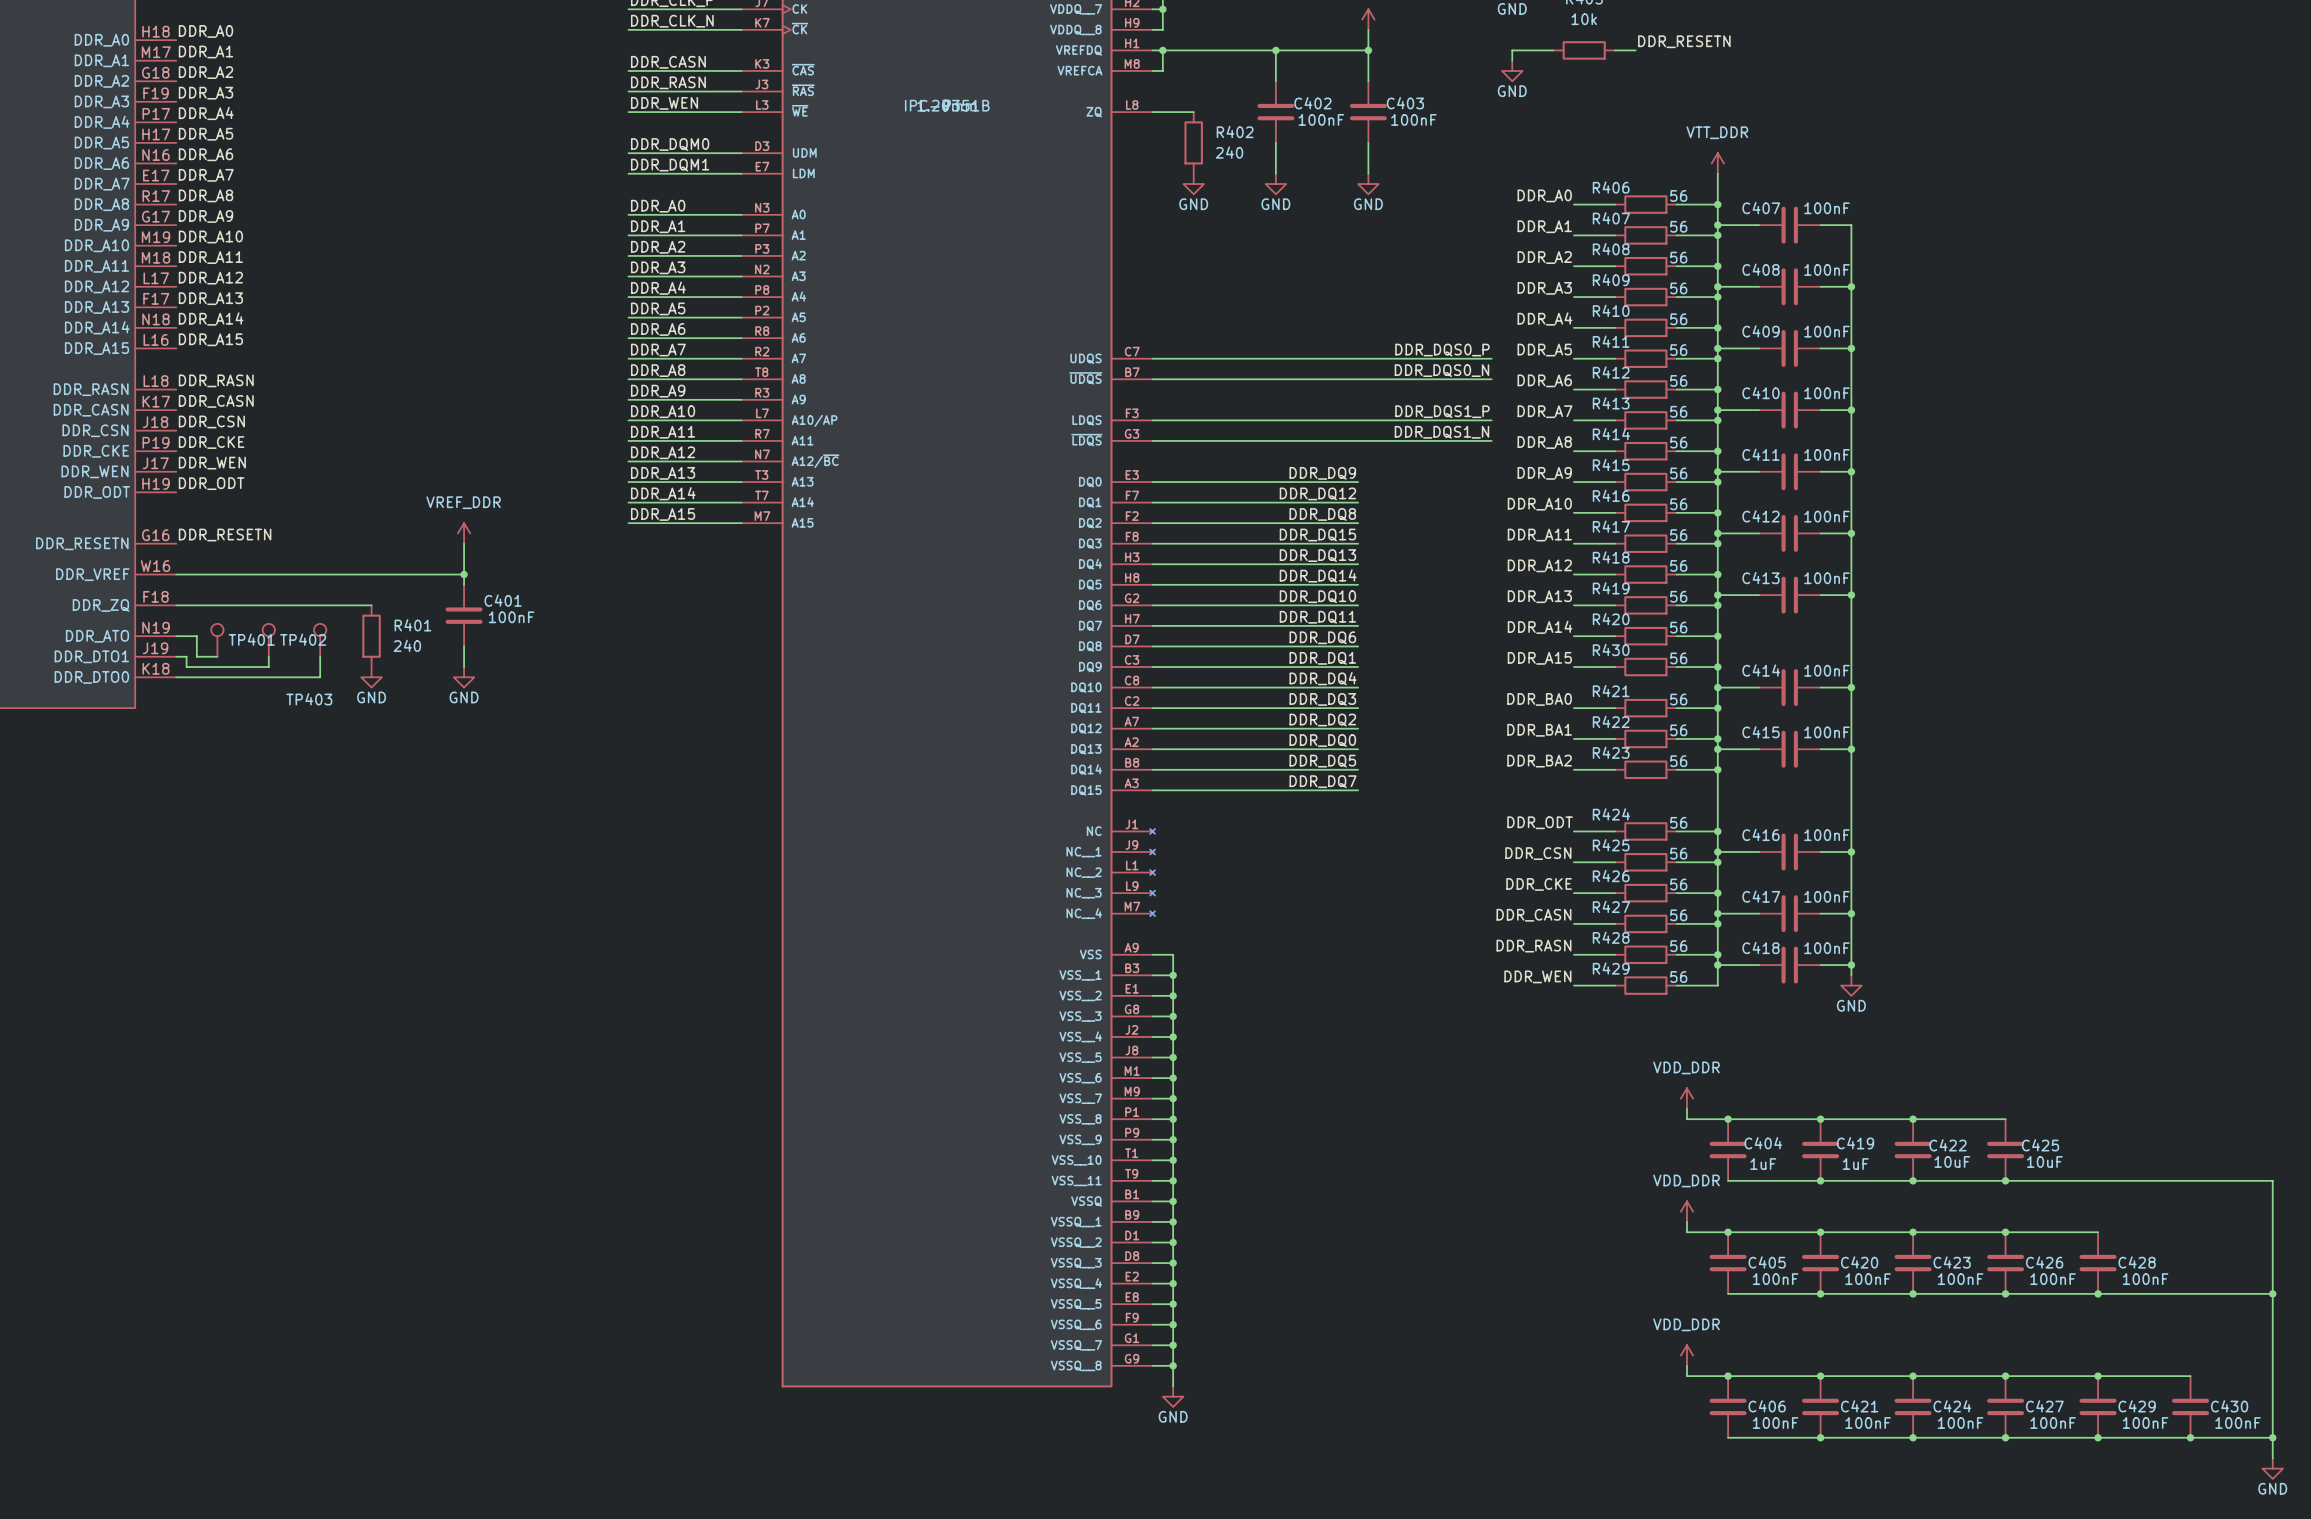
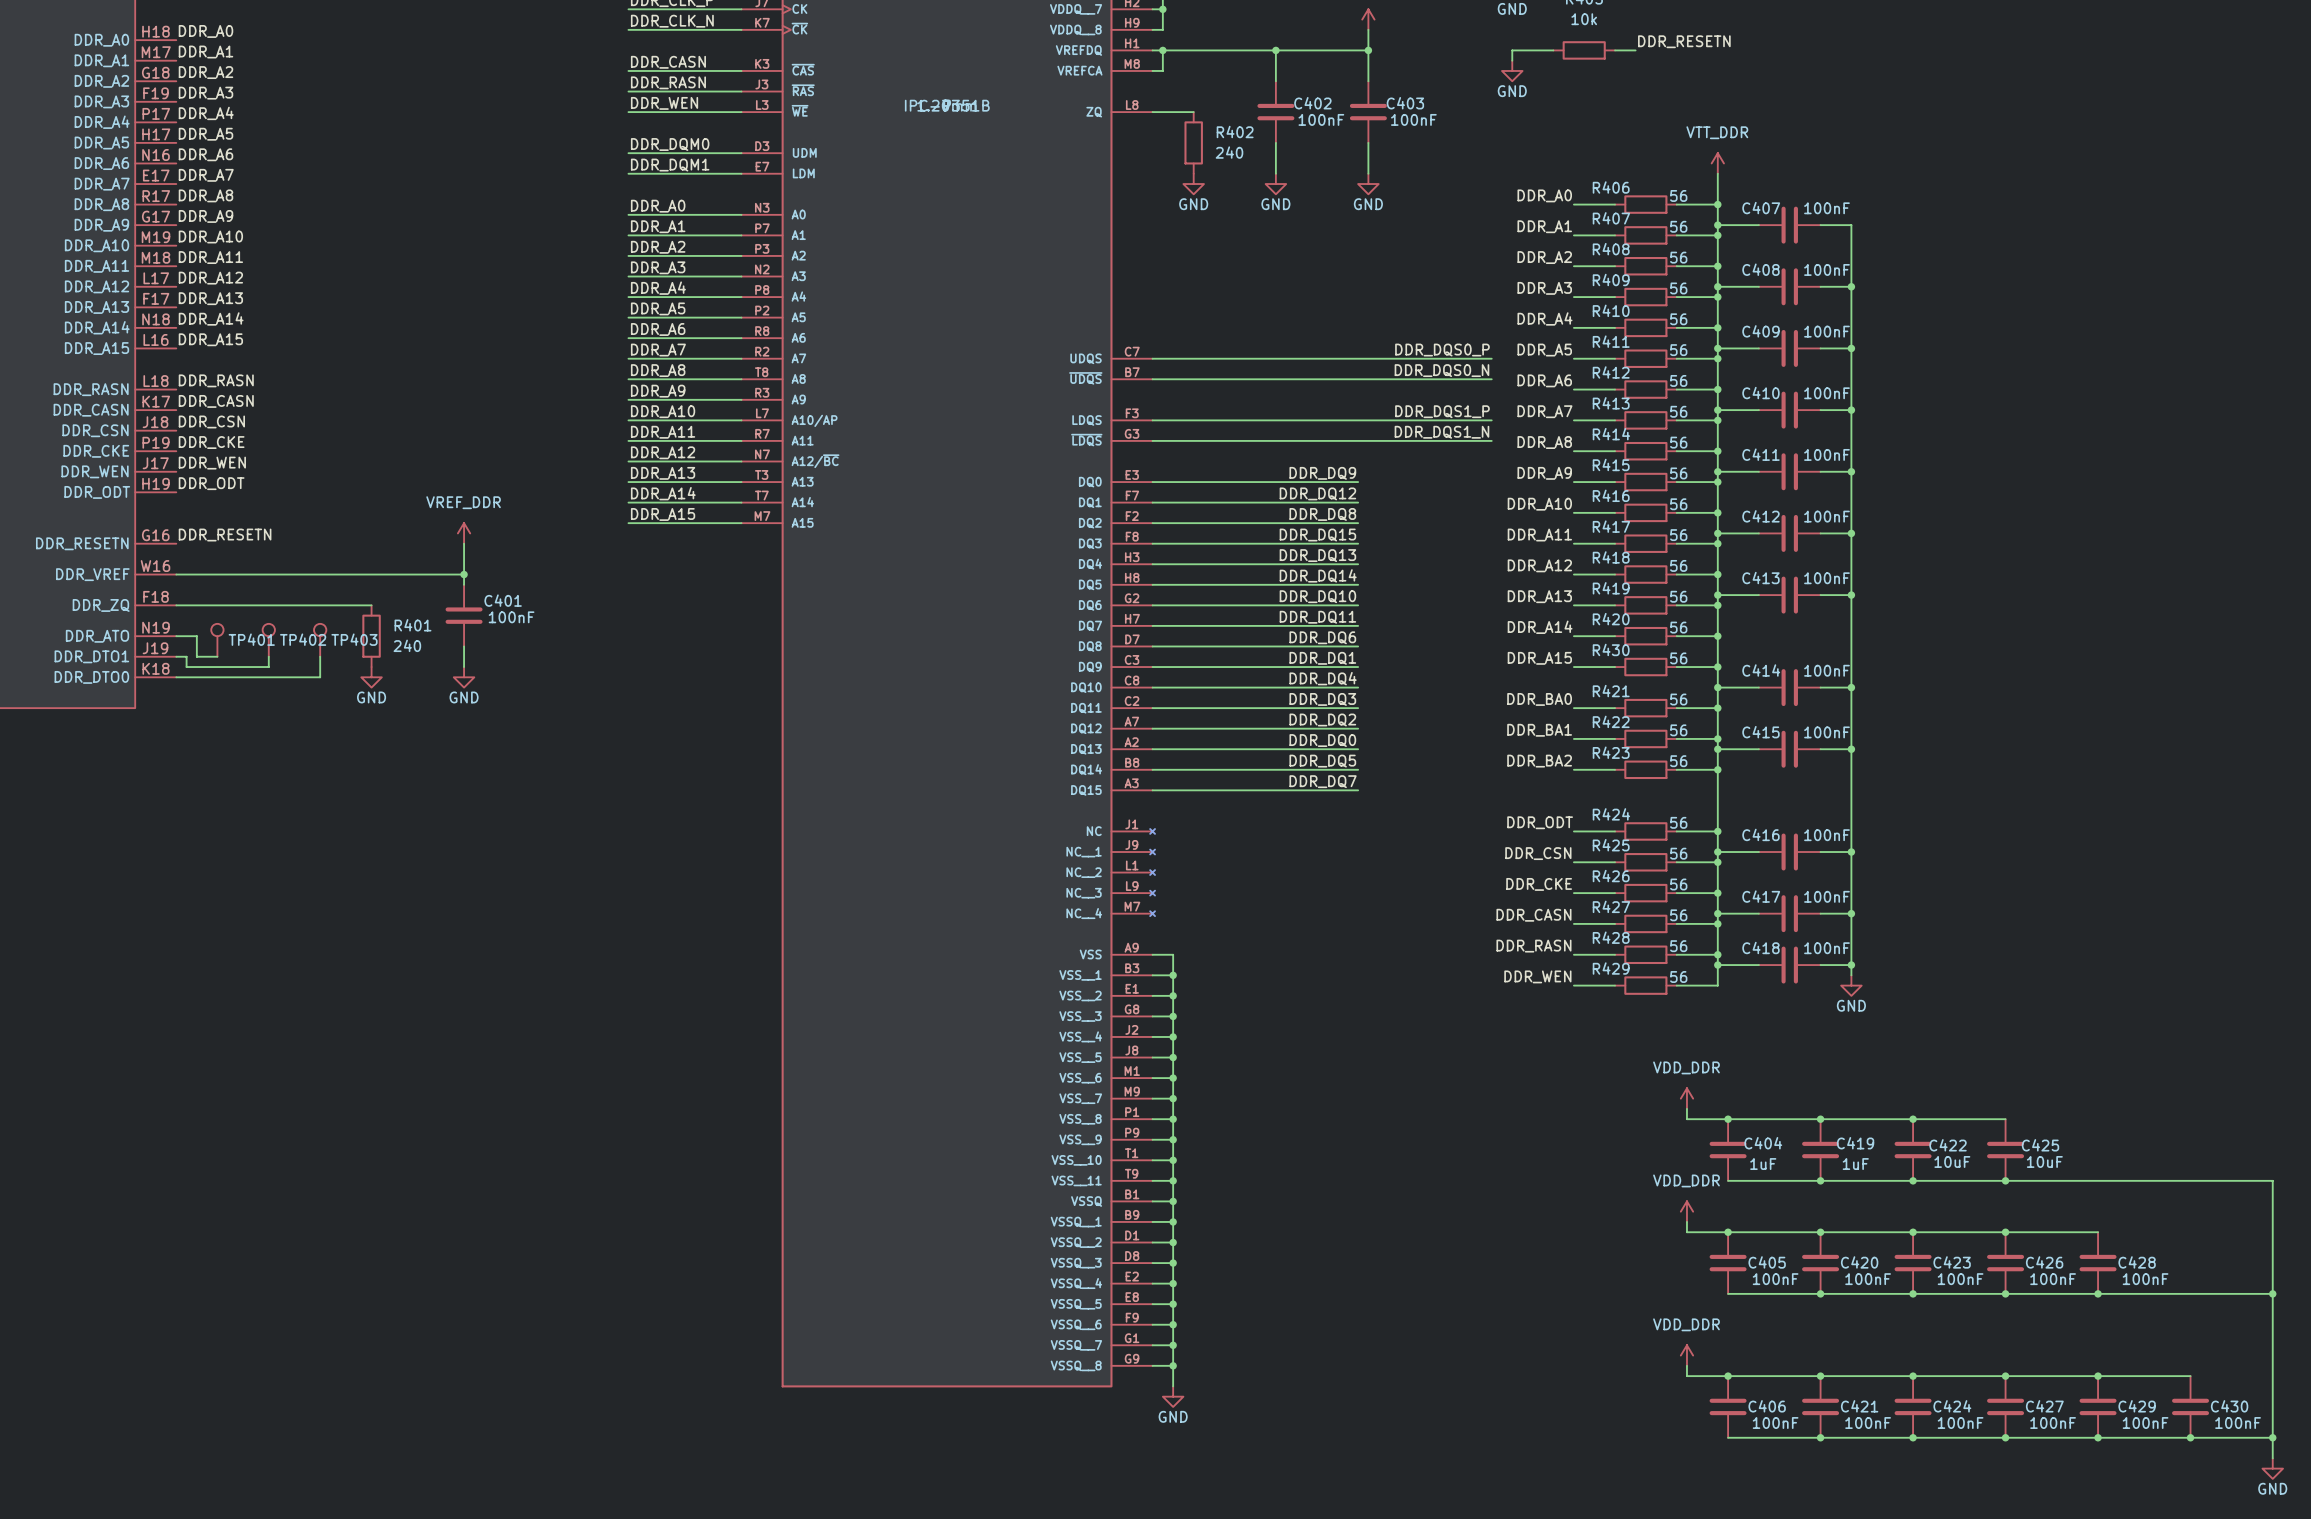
TP403 name position: TP403 (309, 699) -> TP403 (354, 639)

